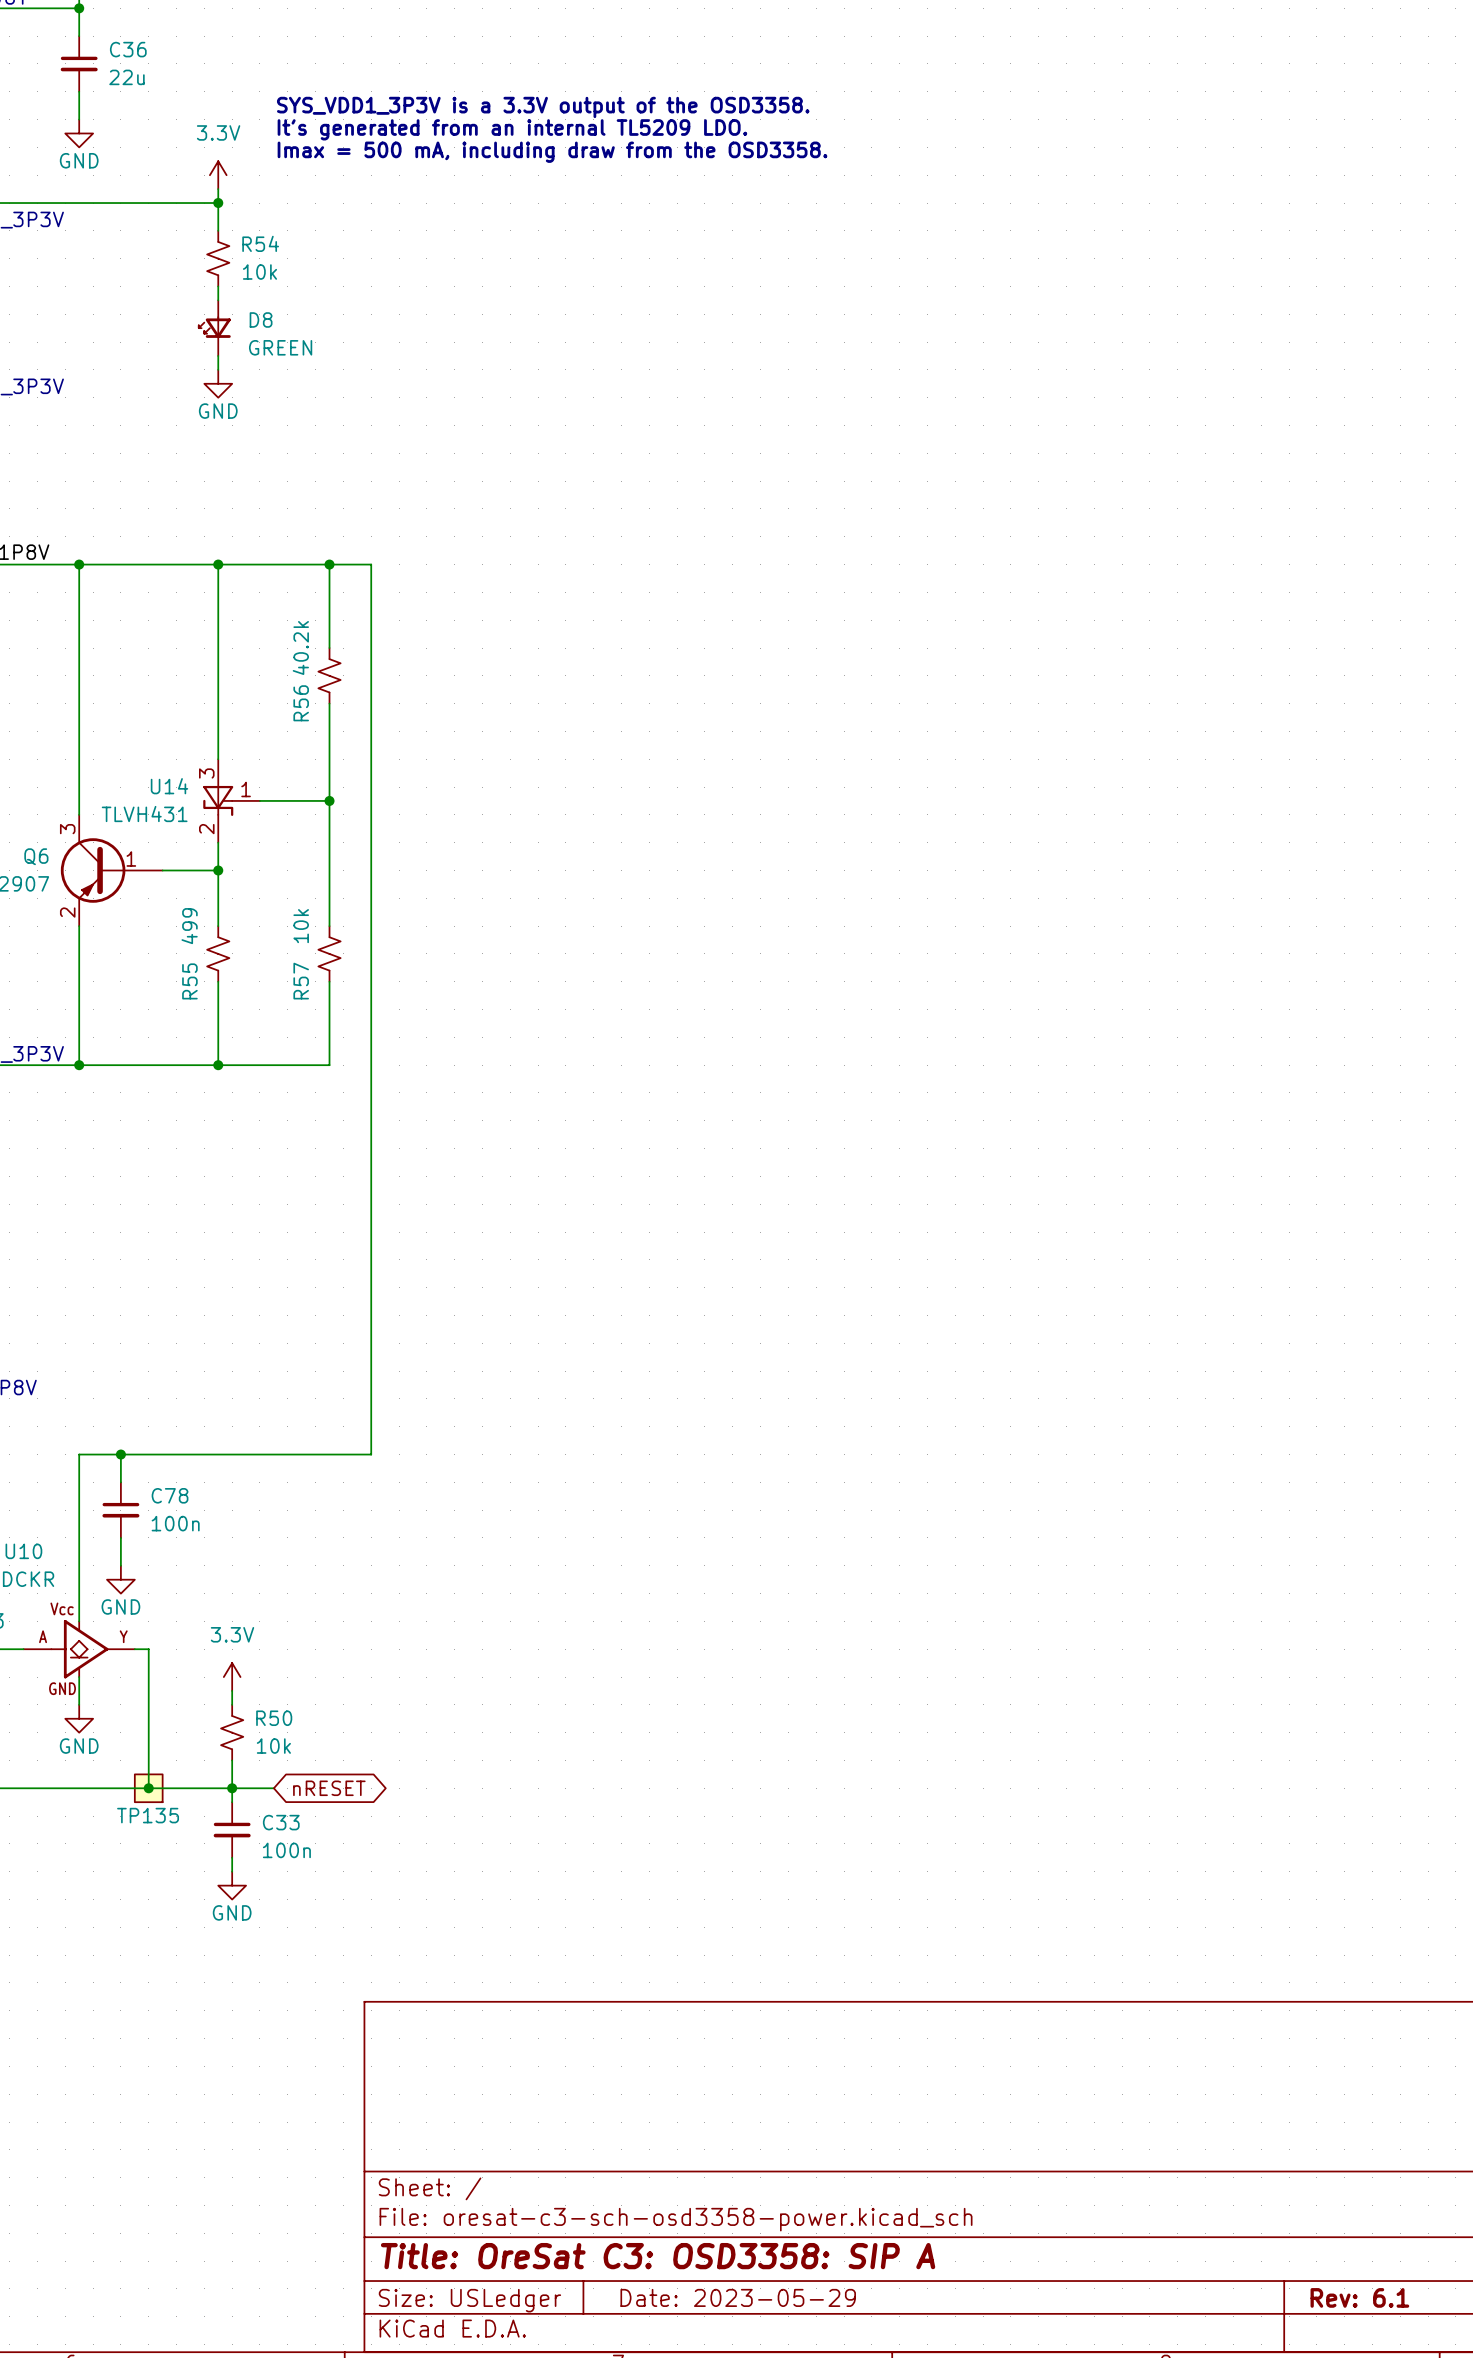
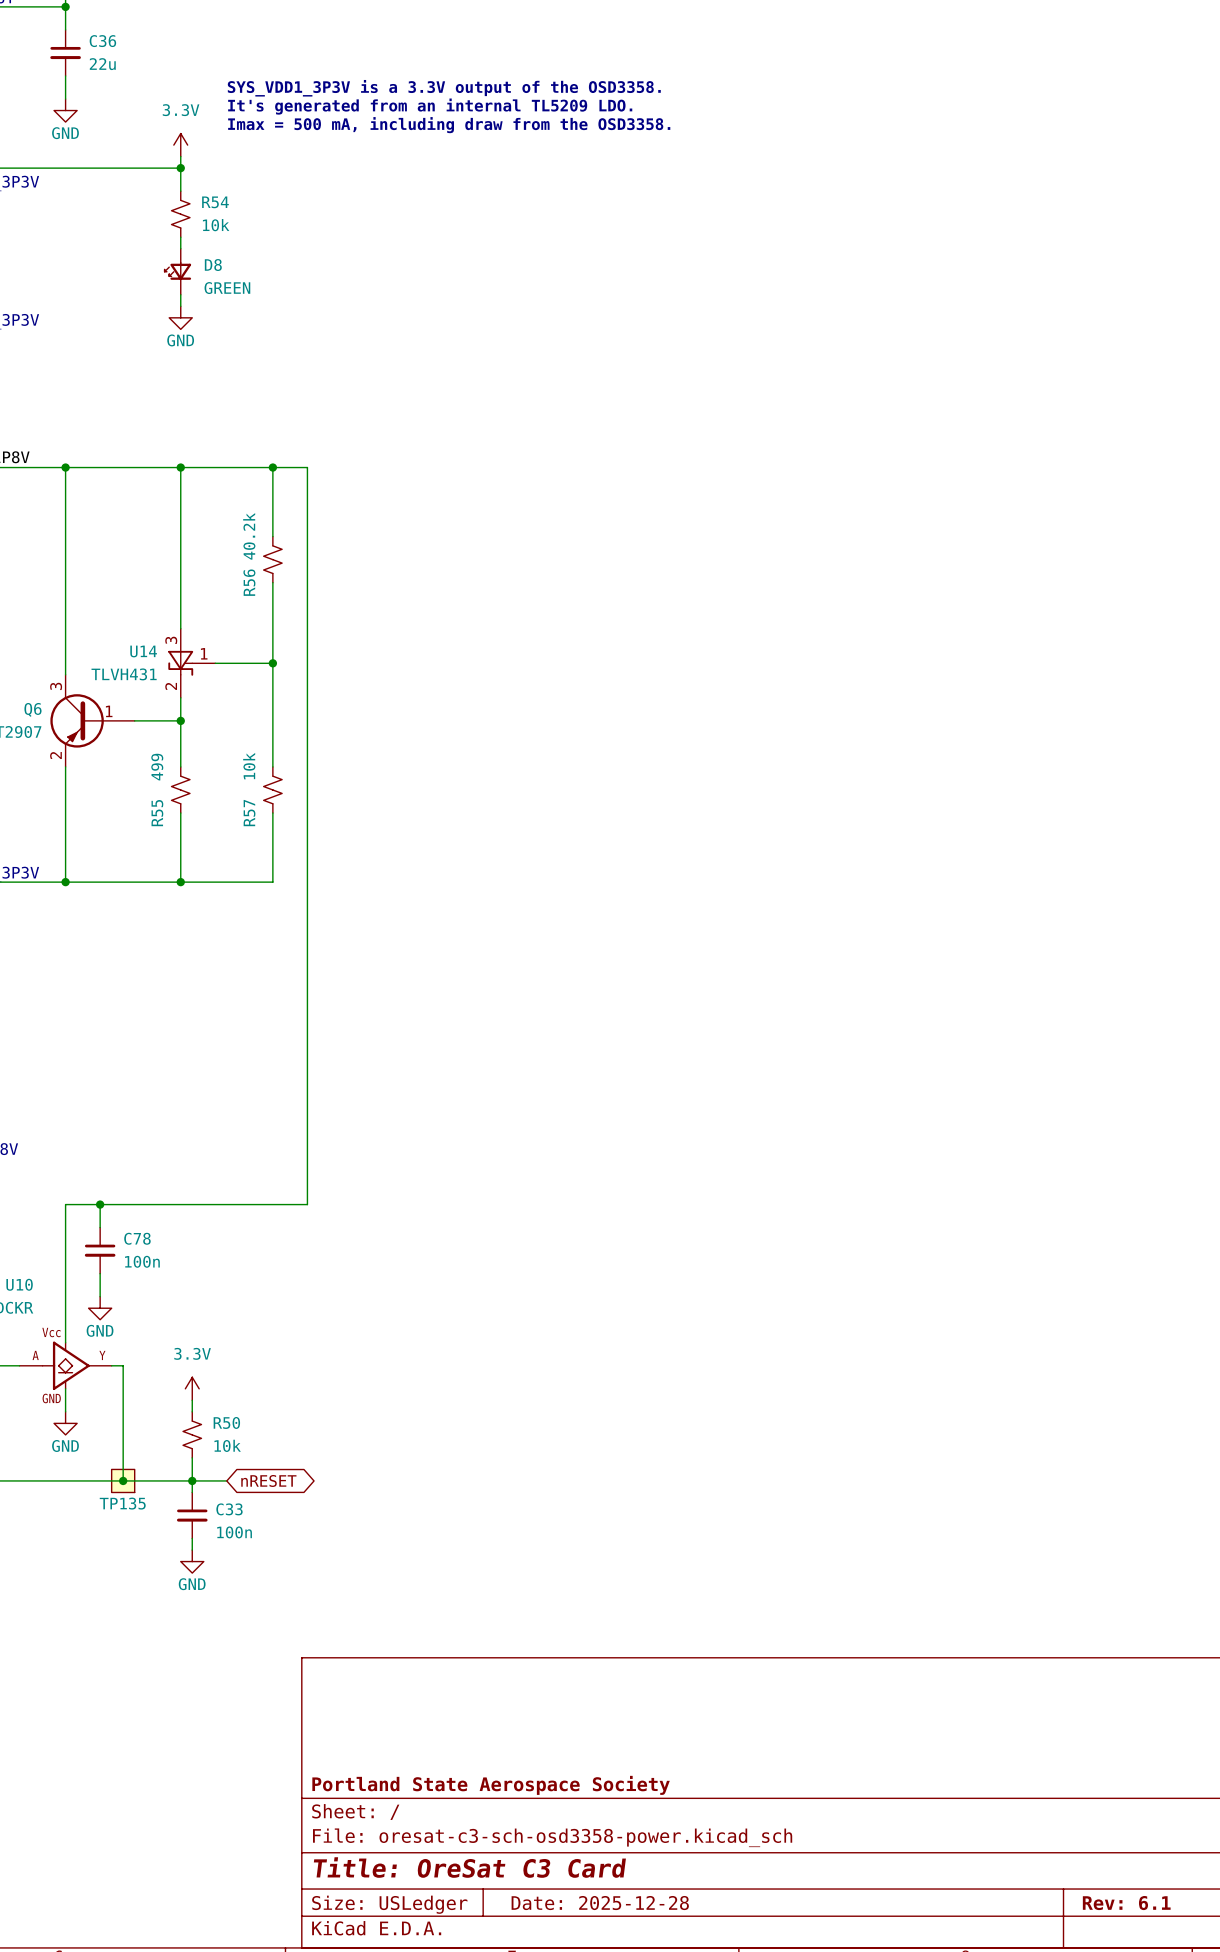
title block: none -> Portland State Aerospace Society (491, 1785)
title block: Title: OreSat C3: OSD3358: SIP A (658, 2256) -> Title: OreSat C3 Card (469, 1867)
title block: Date: 2023-05-29 (738, 2297) -> Date: 2025-12-28 (600, 1903)

